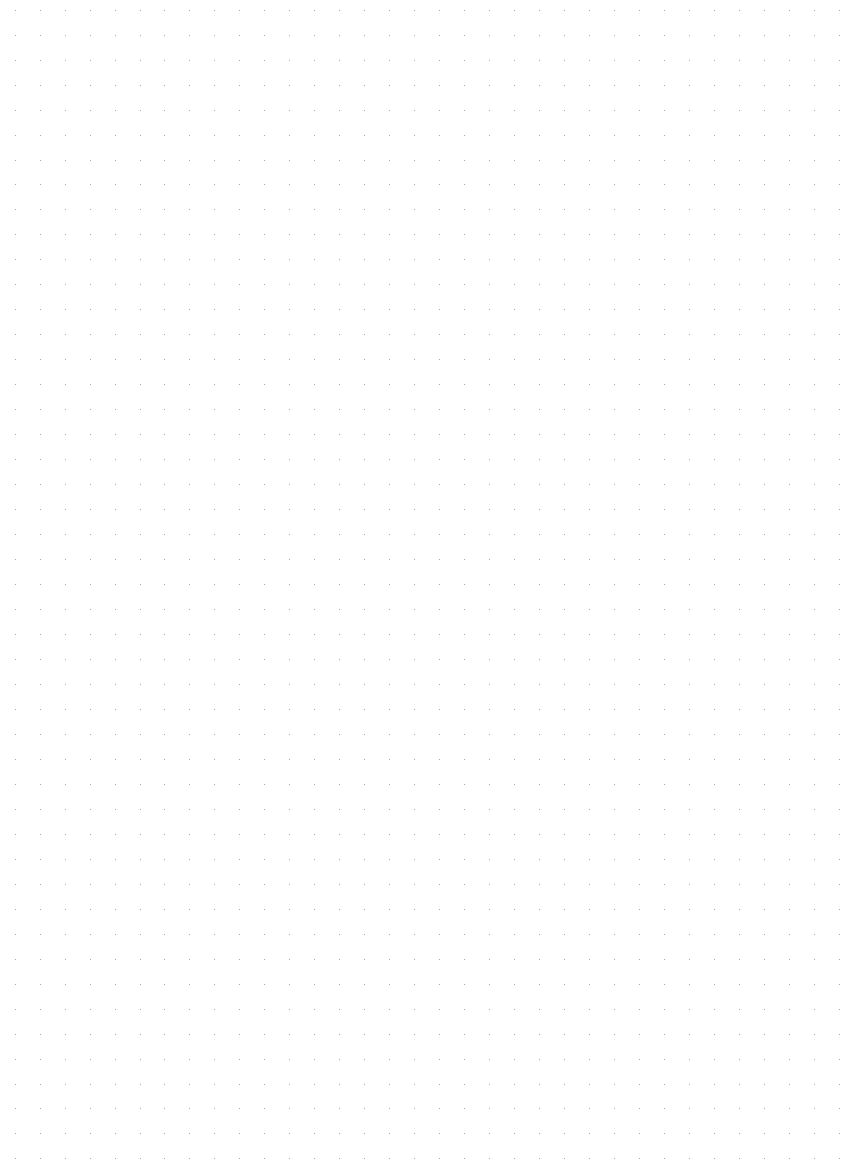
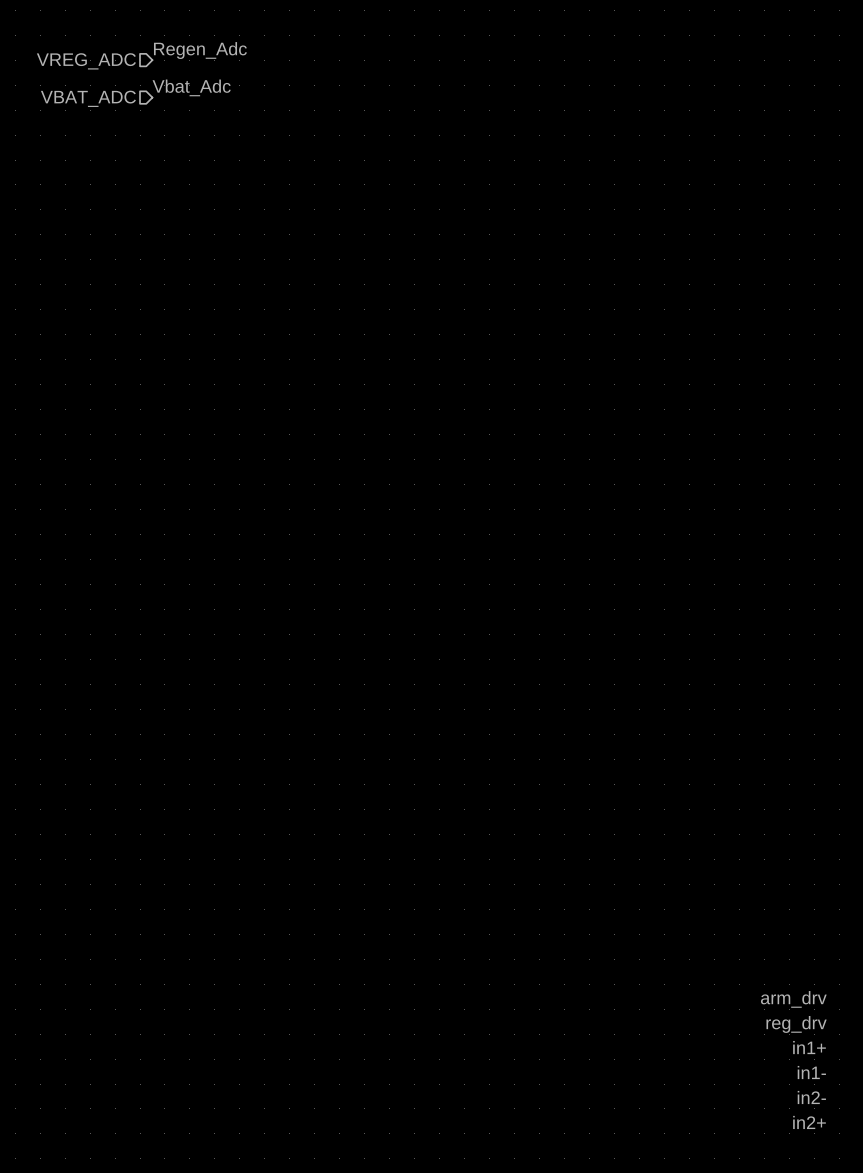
label: none -> Regen_Adc (200, 50)
hierarchical label: none -> VREG_ADC (86, 61)
label: none -> Vbat_Adc (191, 87)
hierarchical label: none -> VBAT_ADC (88, 98)
label: none -> arm_drv (793, 999)
label: none -> reg_drv (796, 1024)
label: none -> in1+ (809, 1047)
label: none -> in1- (811, 1072)
label: none -> in2- (811, 1097)
label: none -> in2+ (809, 1122)

